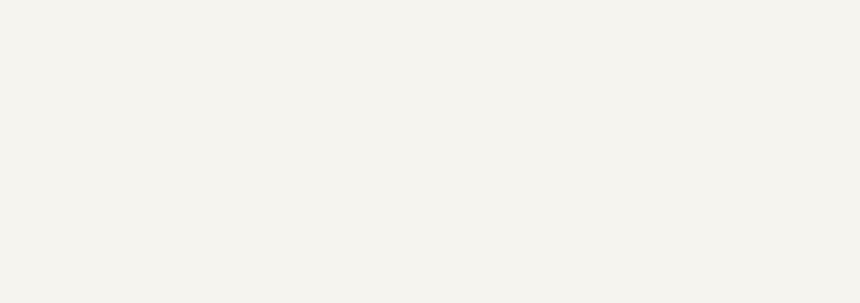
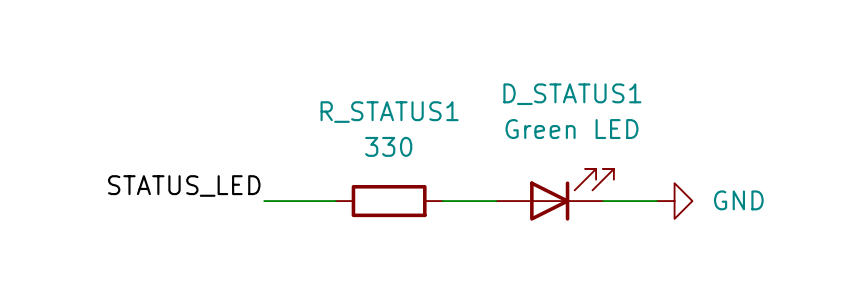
label: none -> STATUS_LED (184, 185)
D_STATUS1: none -> Green LED (555, 194)
wire: none -> (264, 201) (335, 201)
R_STATUS1: none -> 330 (389, 201)
wire: none -> (442, 201) (496, 201)
wire: none -> (603, 201) (656, 201)
power symbol: none -> GND (674, 201)

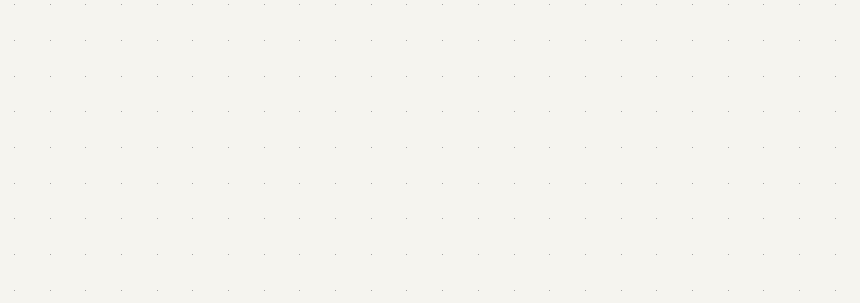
label: STATUS_LED (184, 185) -> none
D_STATUS1: Green LED (555, 194) -> none
wire: (264, 201) (335, 201) -> none
R_STATUS1: 330 (389, 201) -> none
wire: (442, 201) (496, 201) -> none
wire: (603, 201) (656, 201) -> none
power symbol: GND (674, 201) -> none

